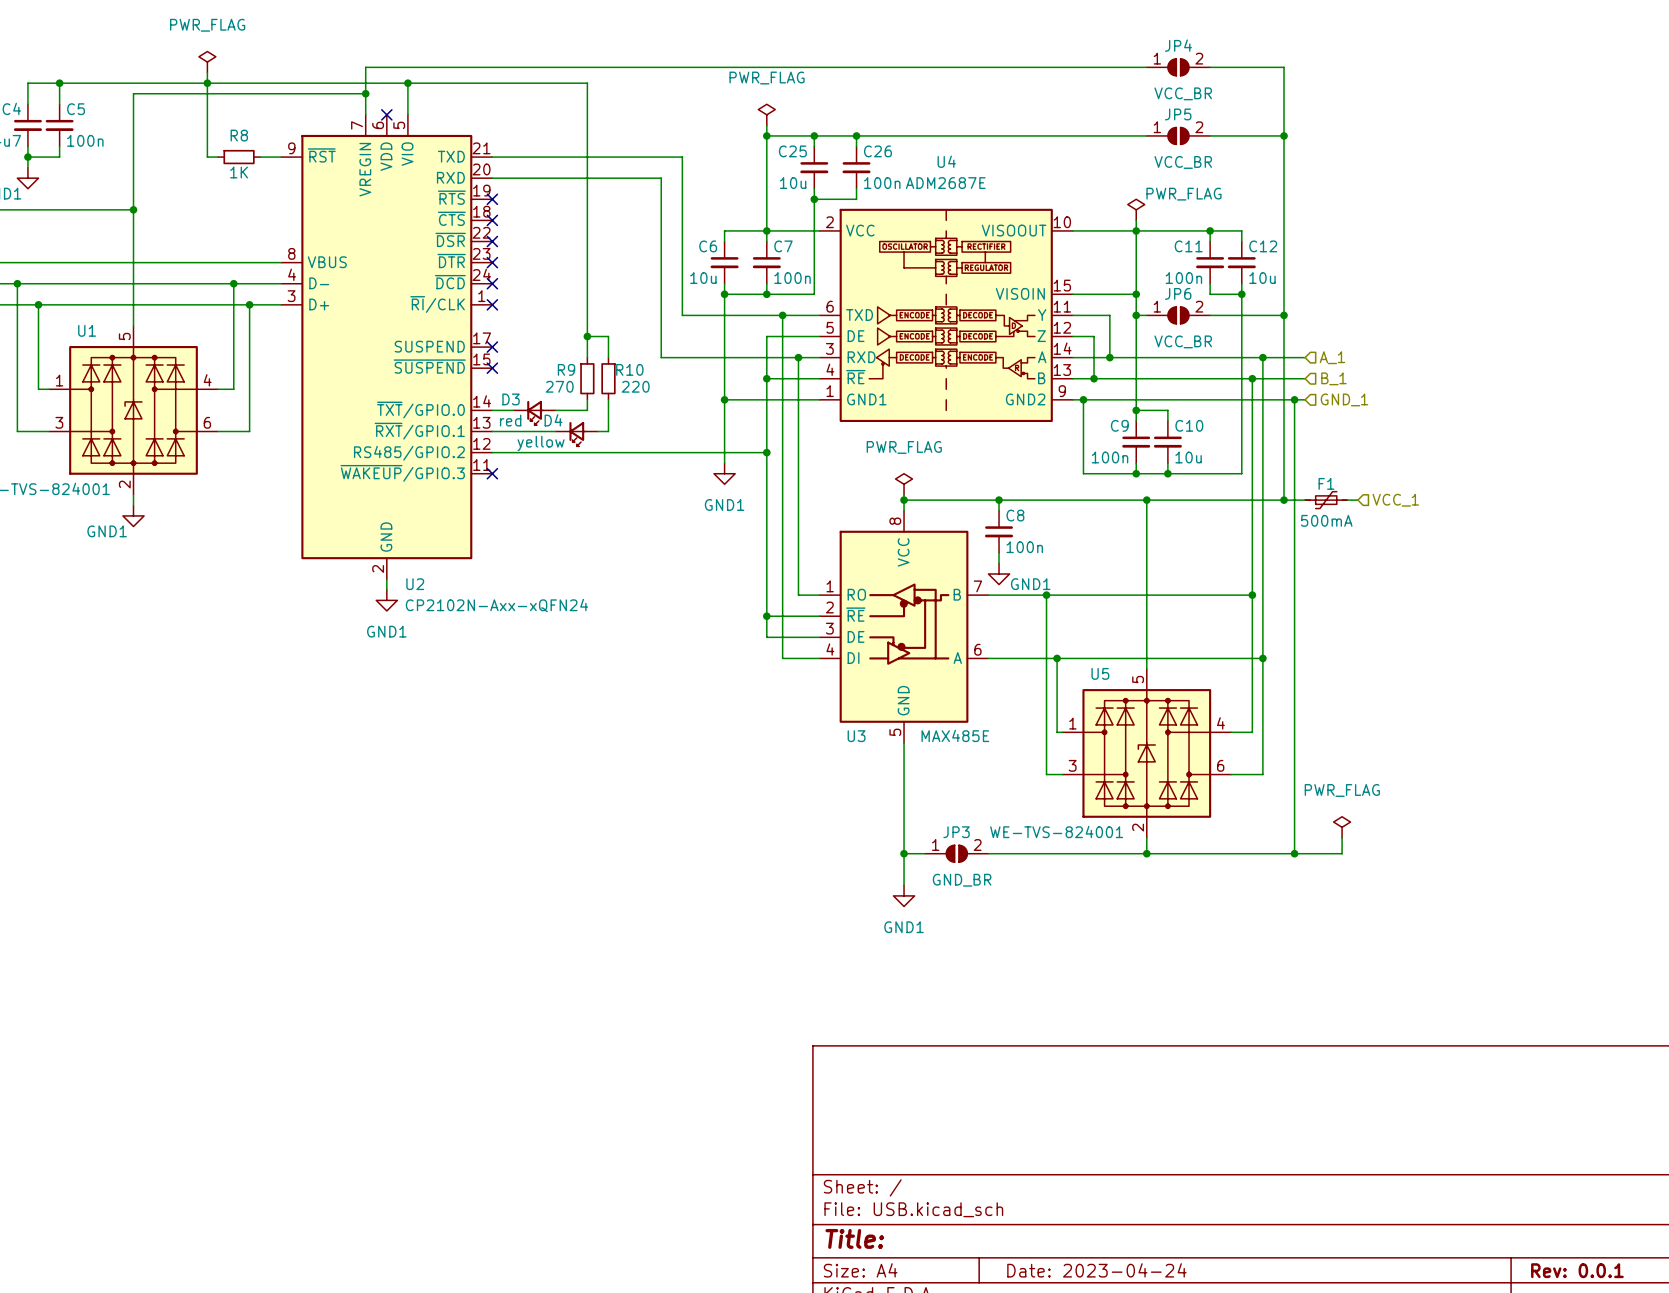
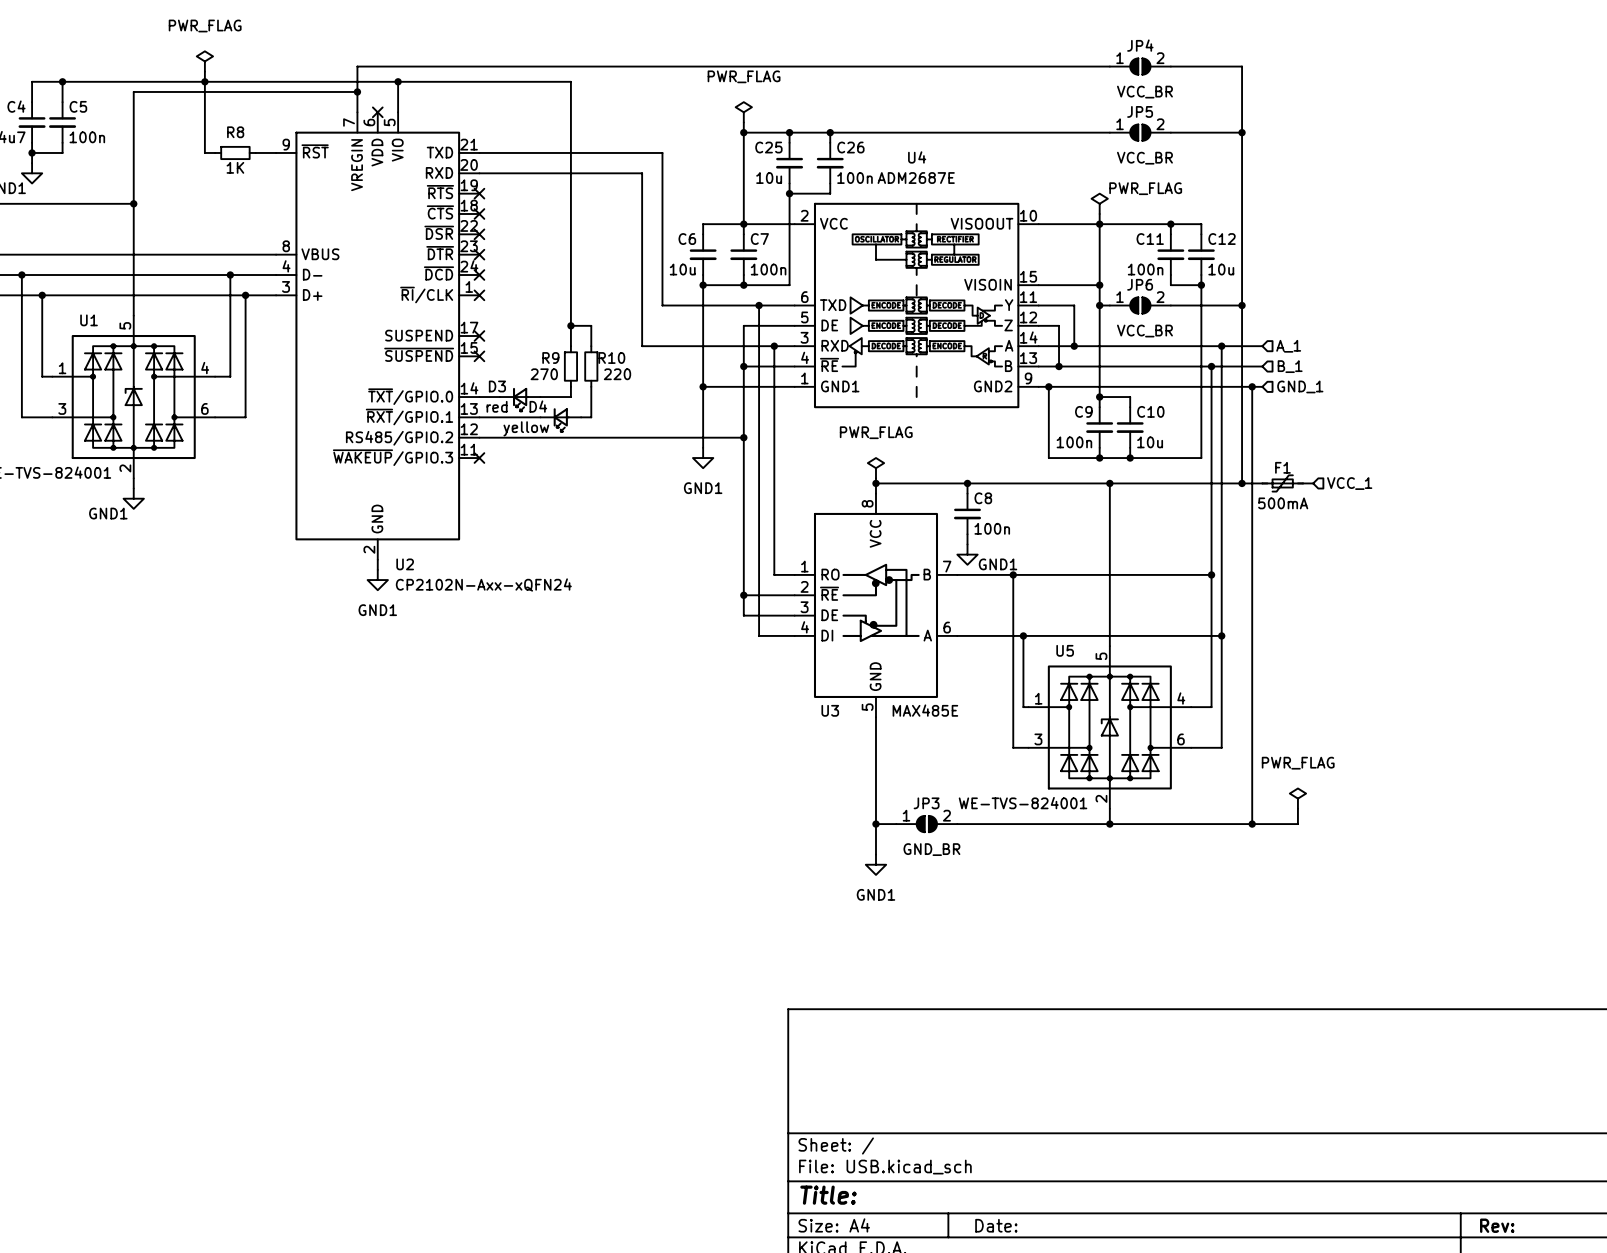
title block: Date: 2023-04-24 (1096, 1270) -> Date: (996, 1225)
title block: Rev: 0.0.1 (1577, 1270) -> Rev: (1497, 1225)

